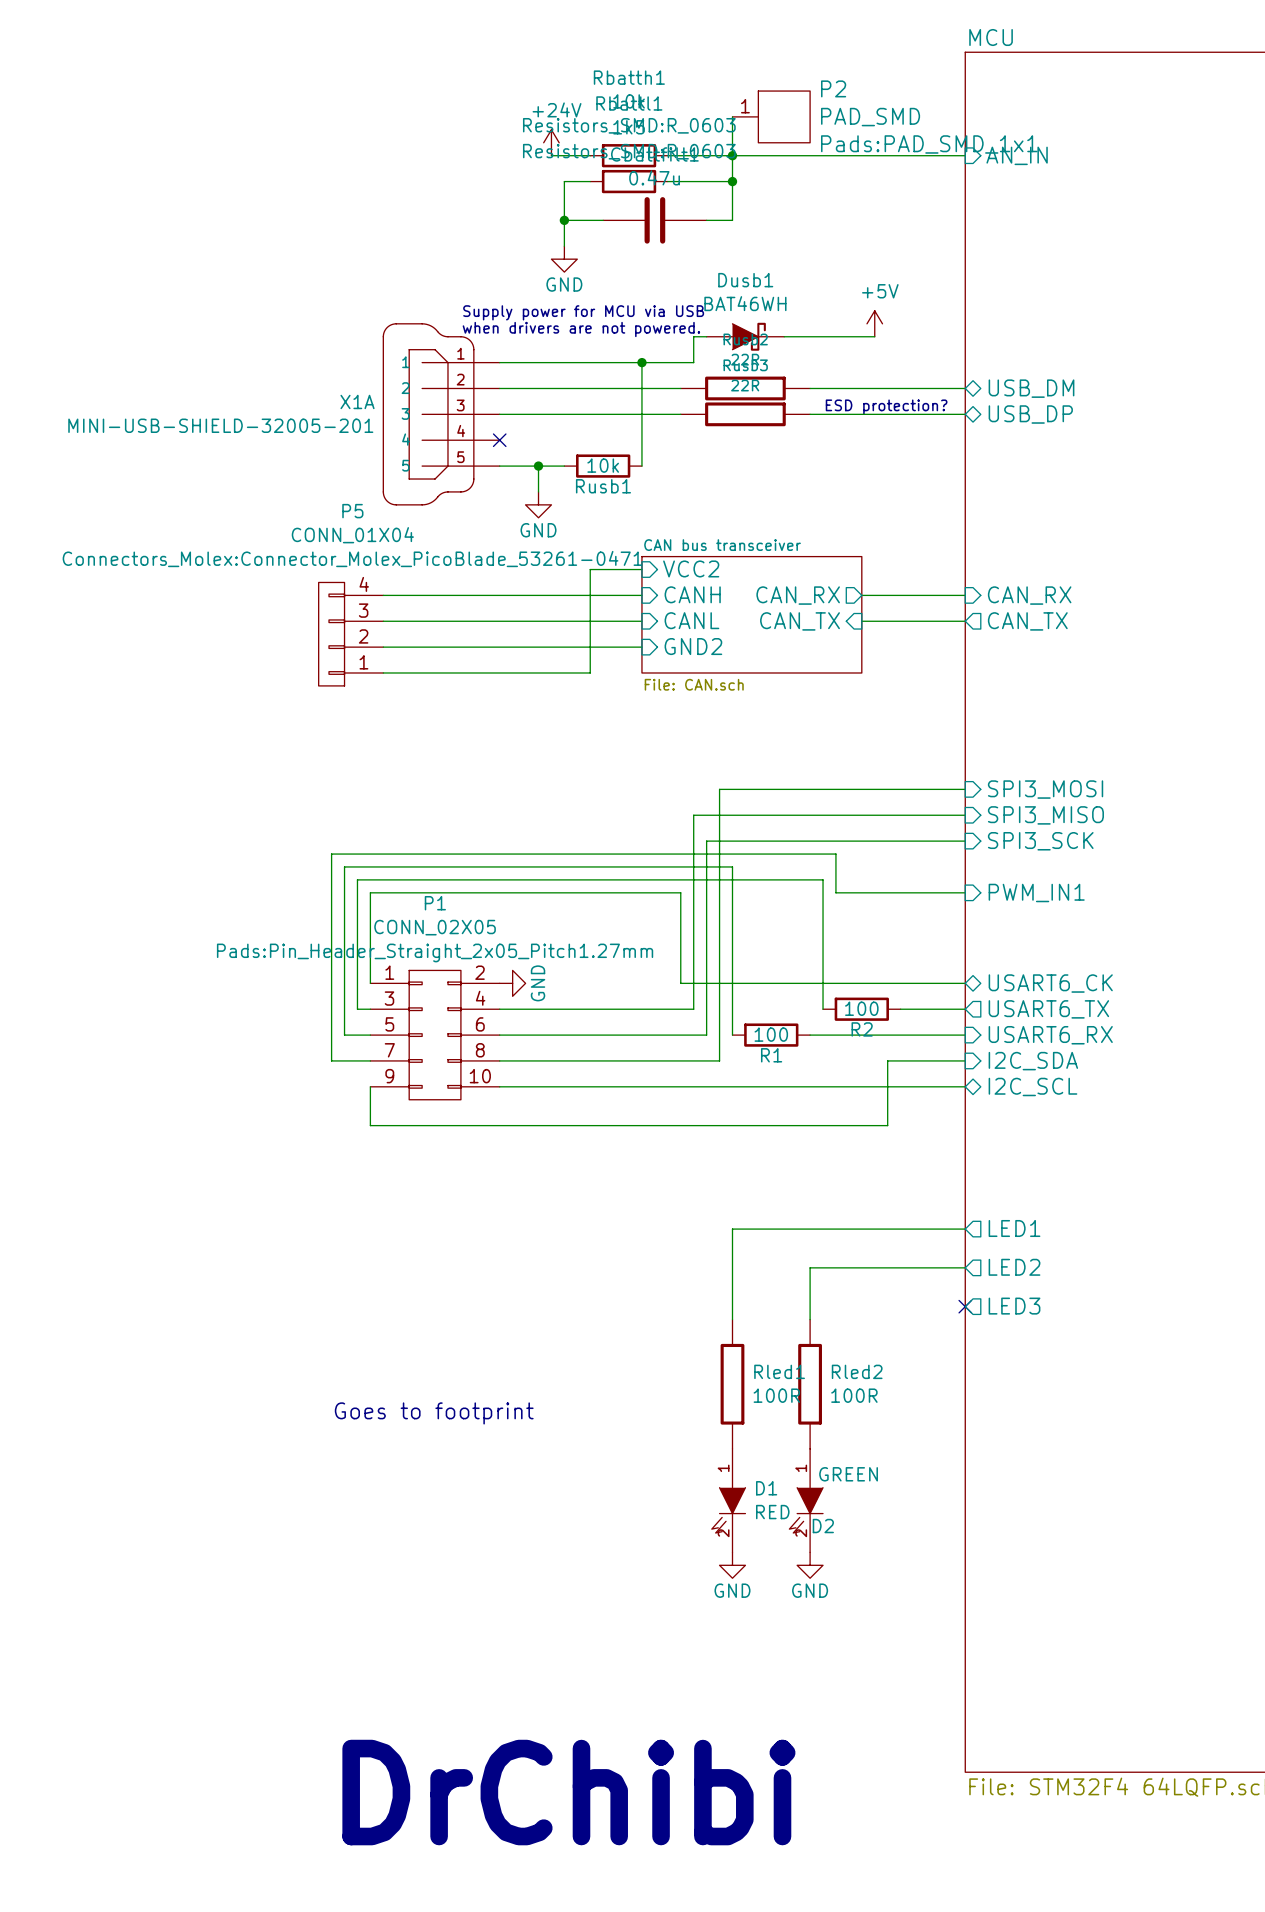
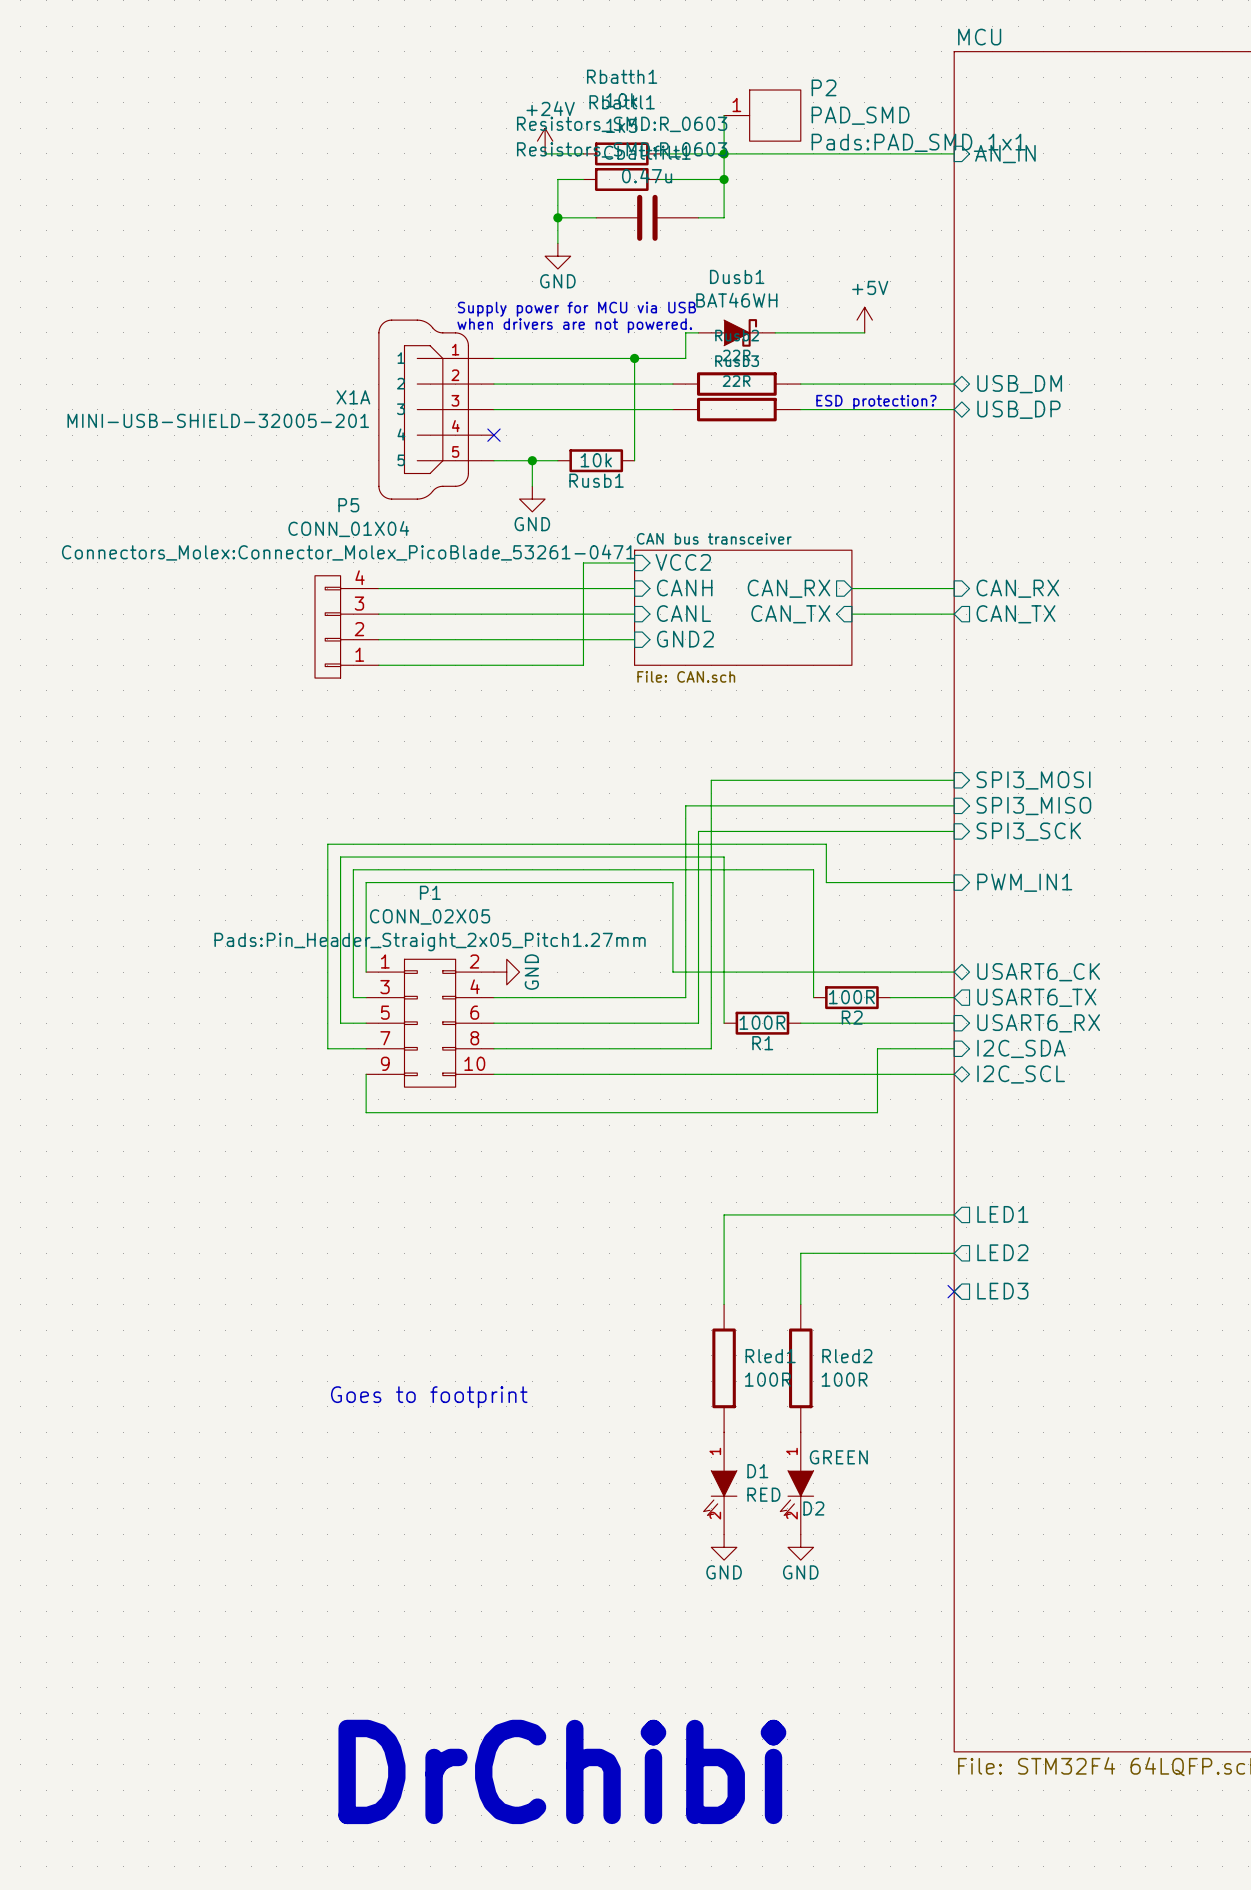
R2 value: 100 (861, 1008) -> 100R (851, 997)
R1 value: 100 (771, 1034) -> 100R (762, 1022)

